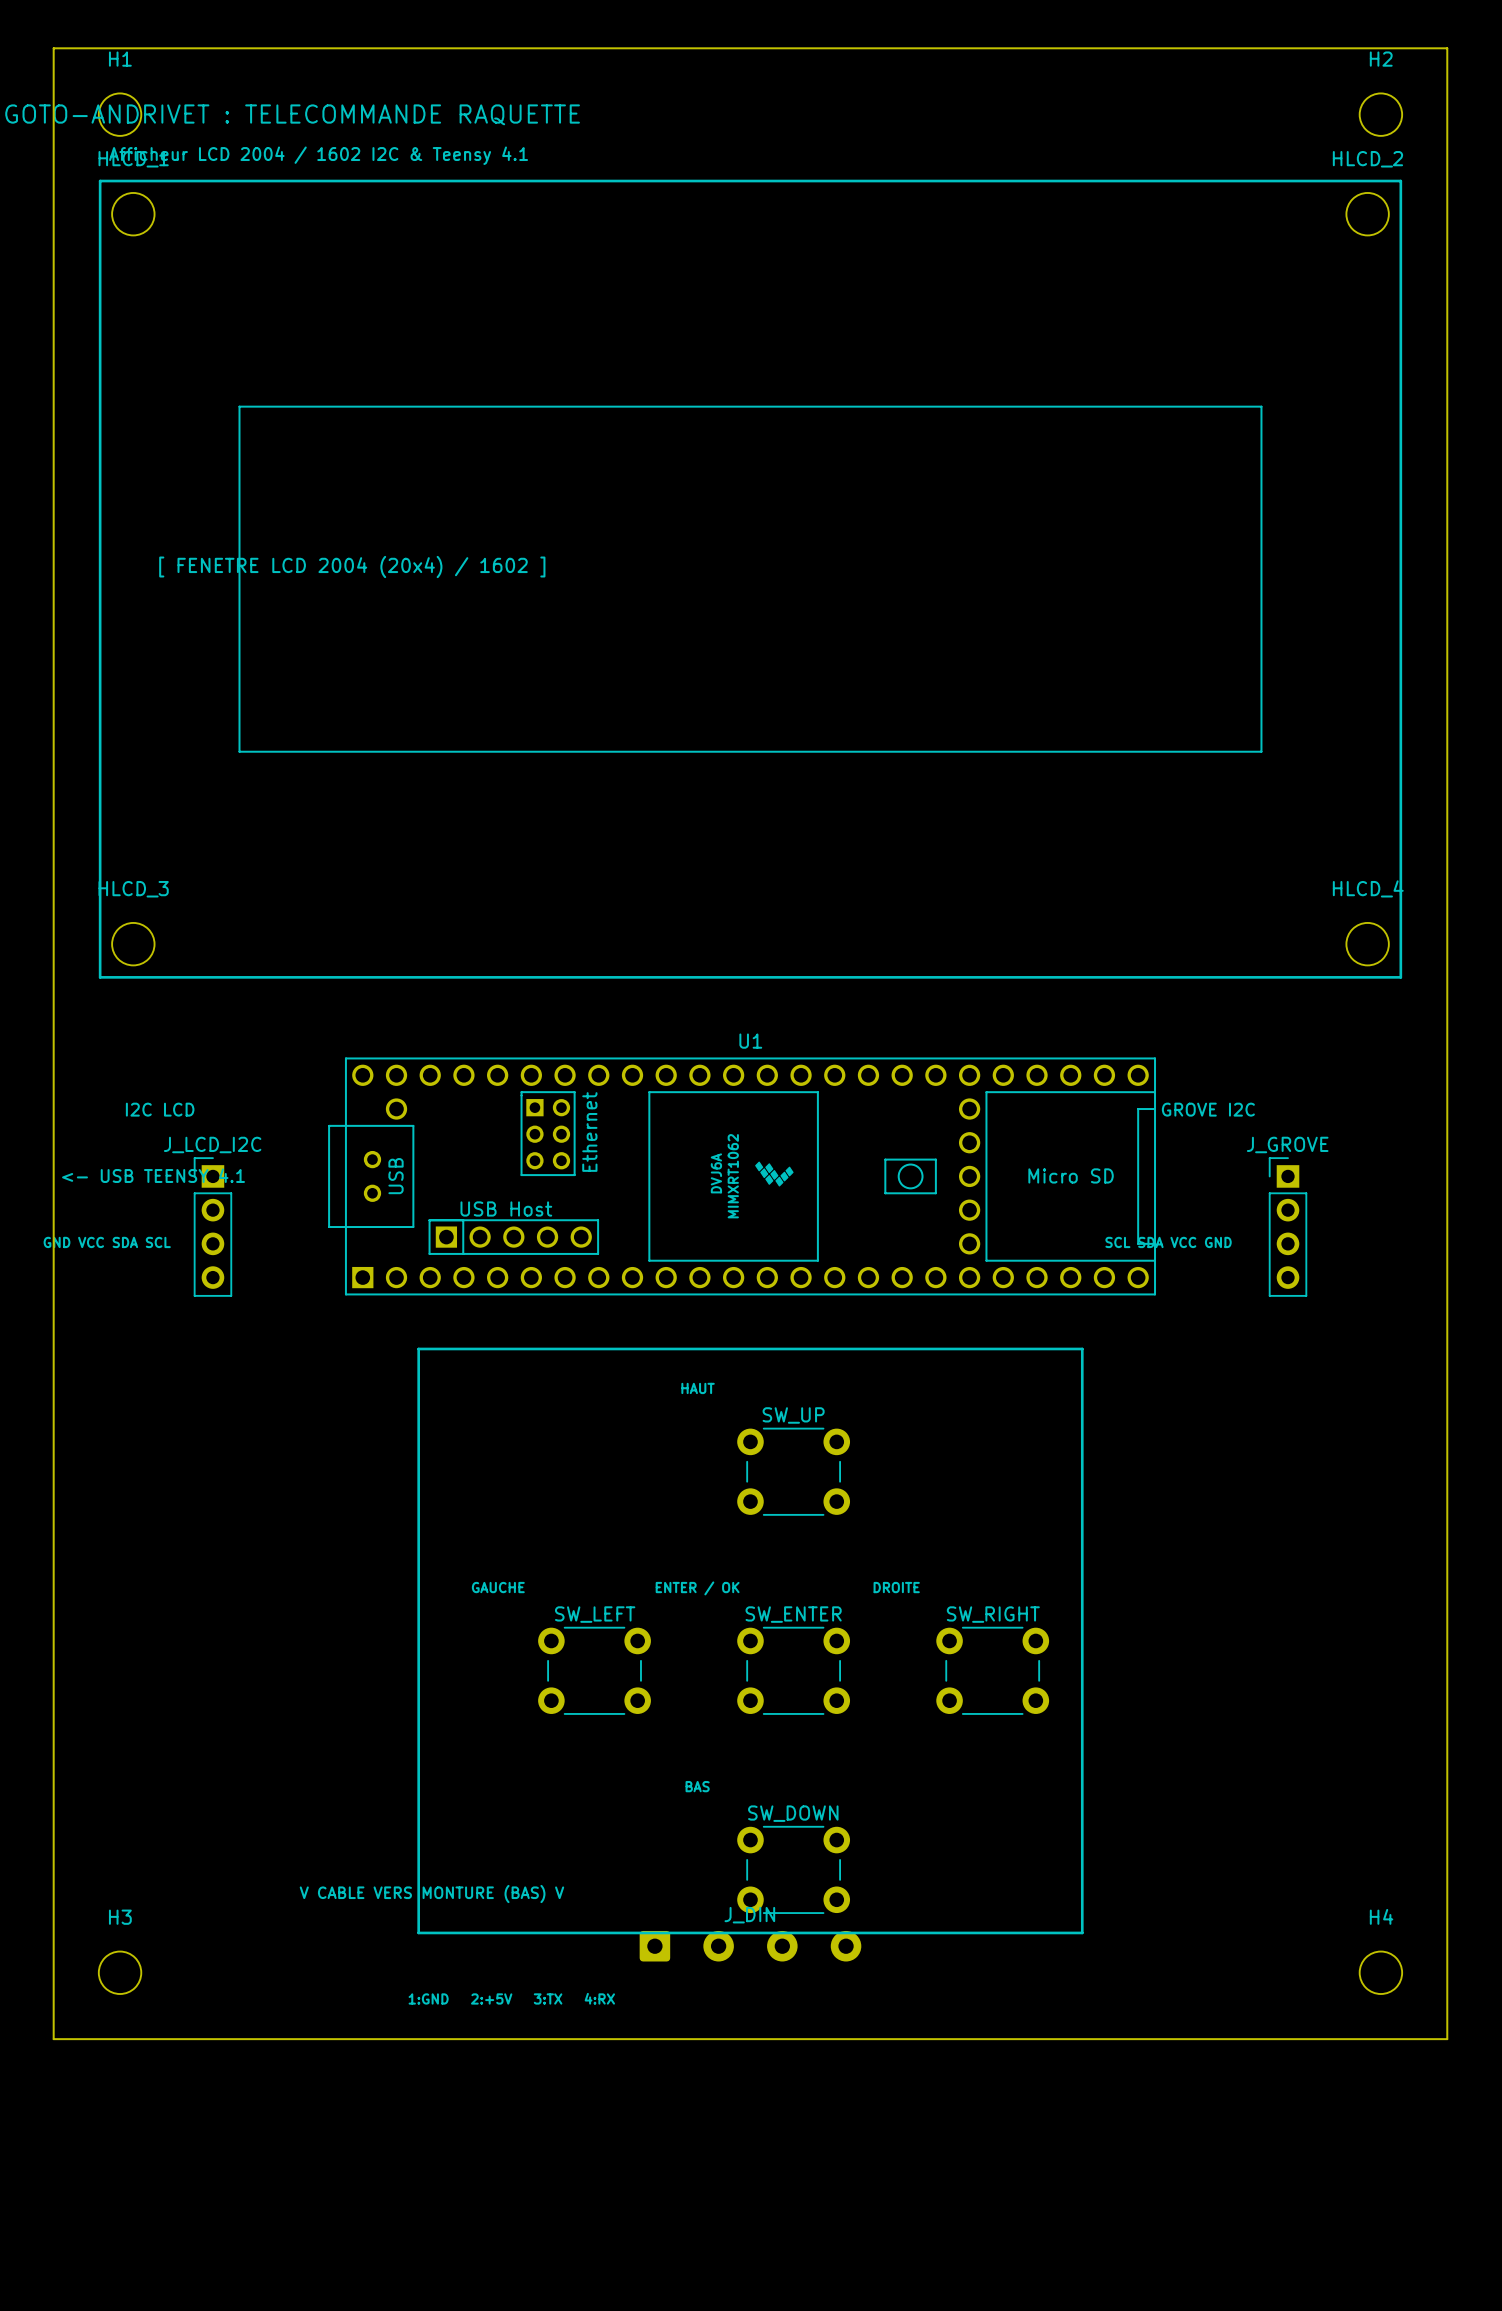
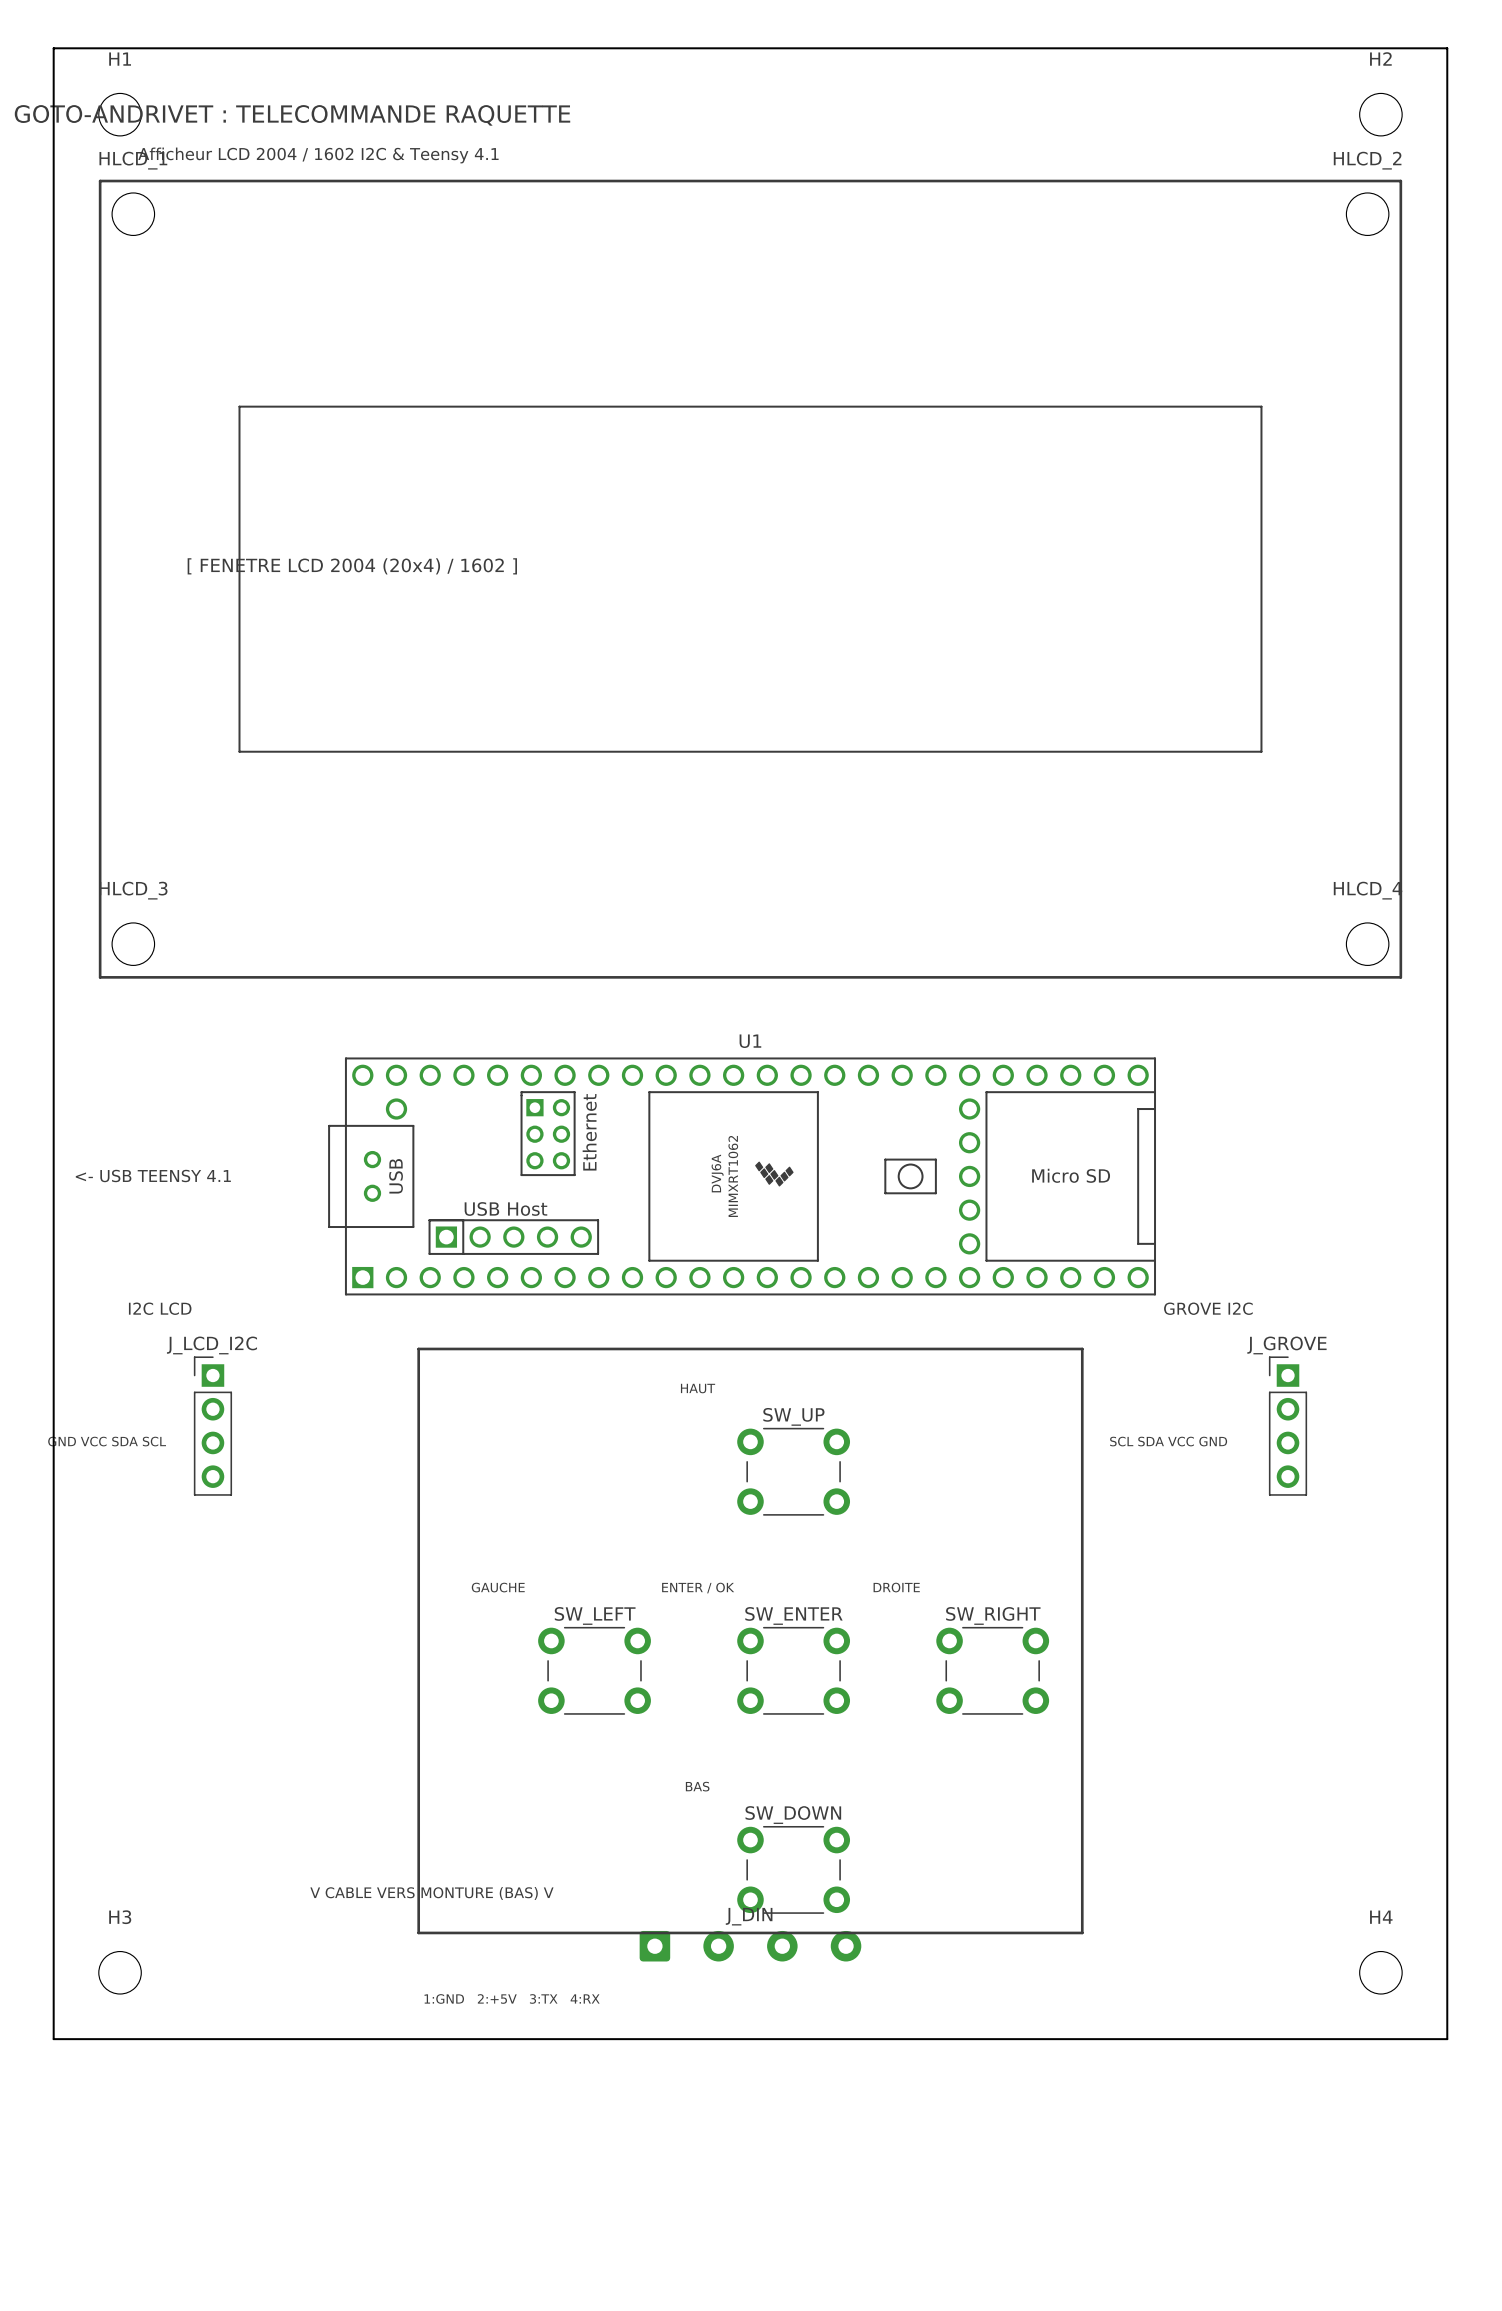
text position: I2C LCD (160, 1109) -> I2C LCD (160, 1308)
text position: GROVE I2C (1208, 1109) -> GROVE I2C (1208, 1308)
J_LCD_I2C position: (212, 1227) -> (212, 1426)
J_GROVE position: (1288, 1227) -> (1288, 1426)
text position: GND VCC SDA SCL (107, 1242) -> GND VCC SDA SCL (107, 1441)
text position: SCL SDA VCC GND (1168, 1242) -> SCL SDA VCC GND (1168, 1441)

